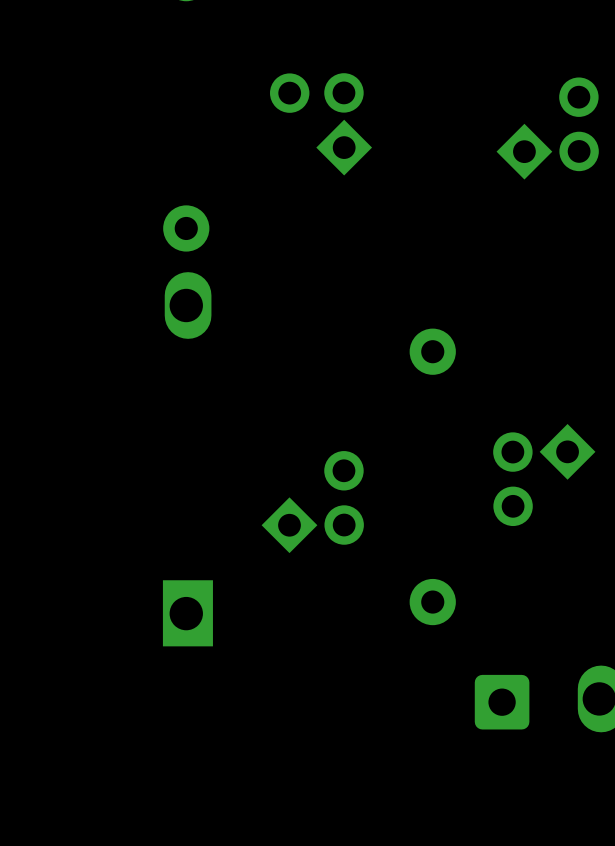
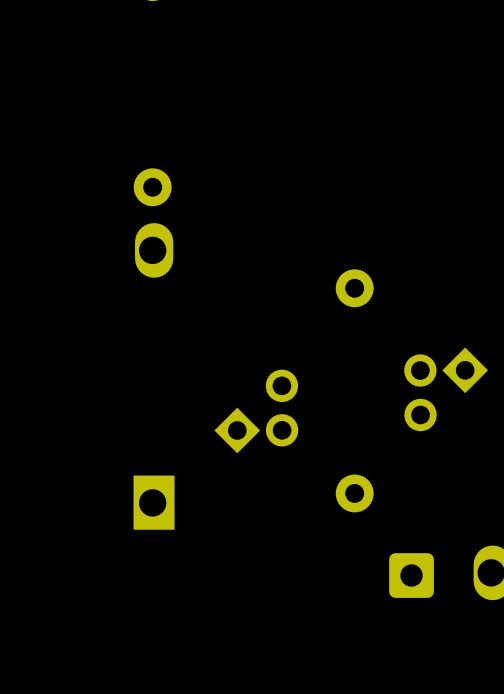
part: (321, 124) -> none
part: (547, 128) -> none

